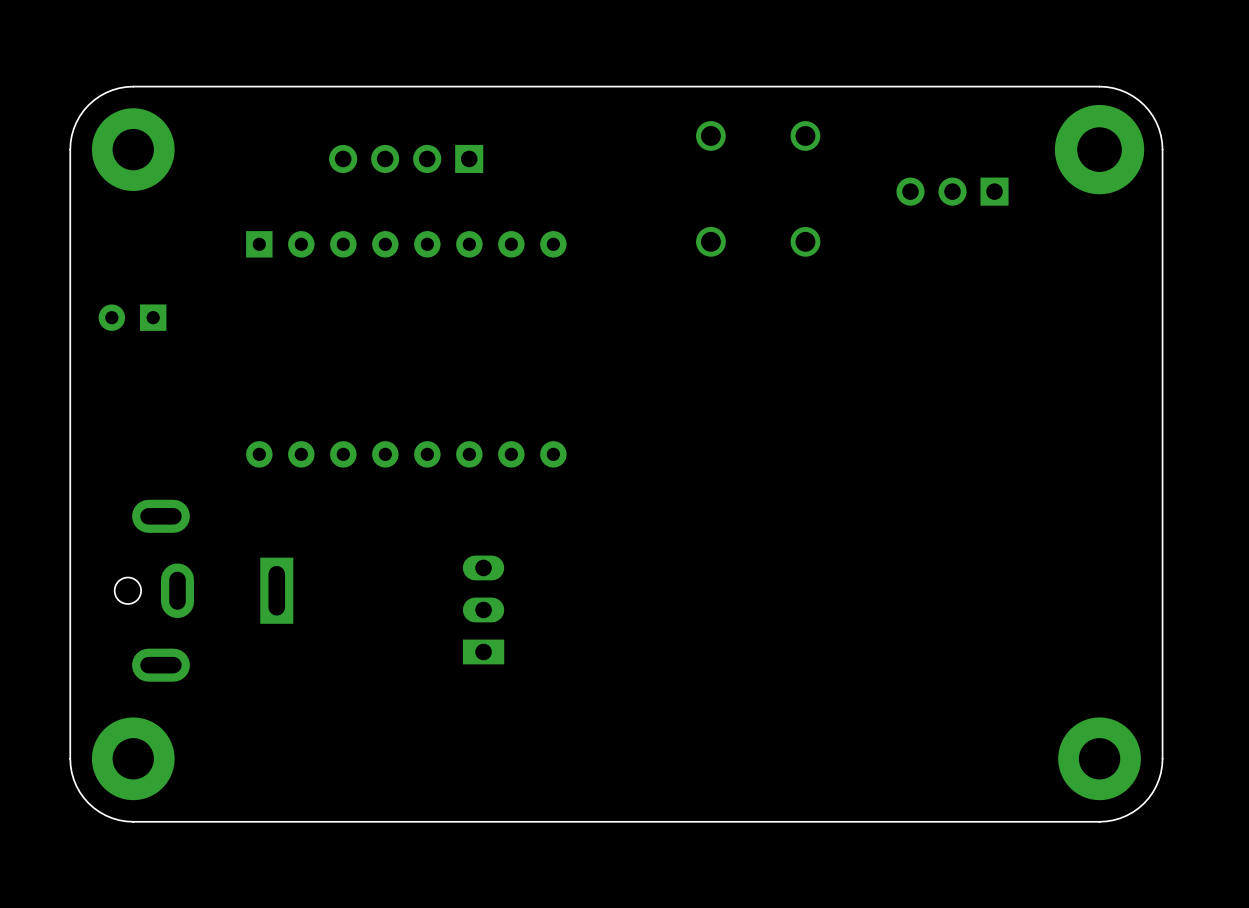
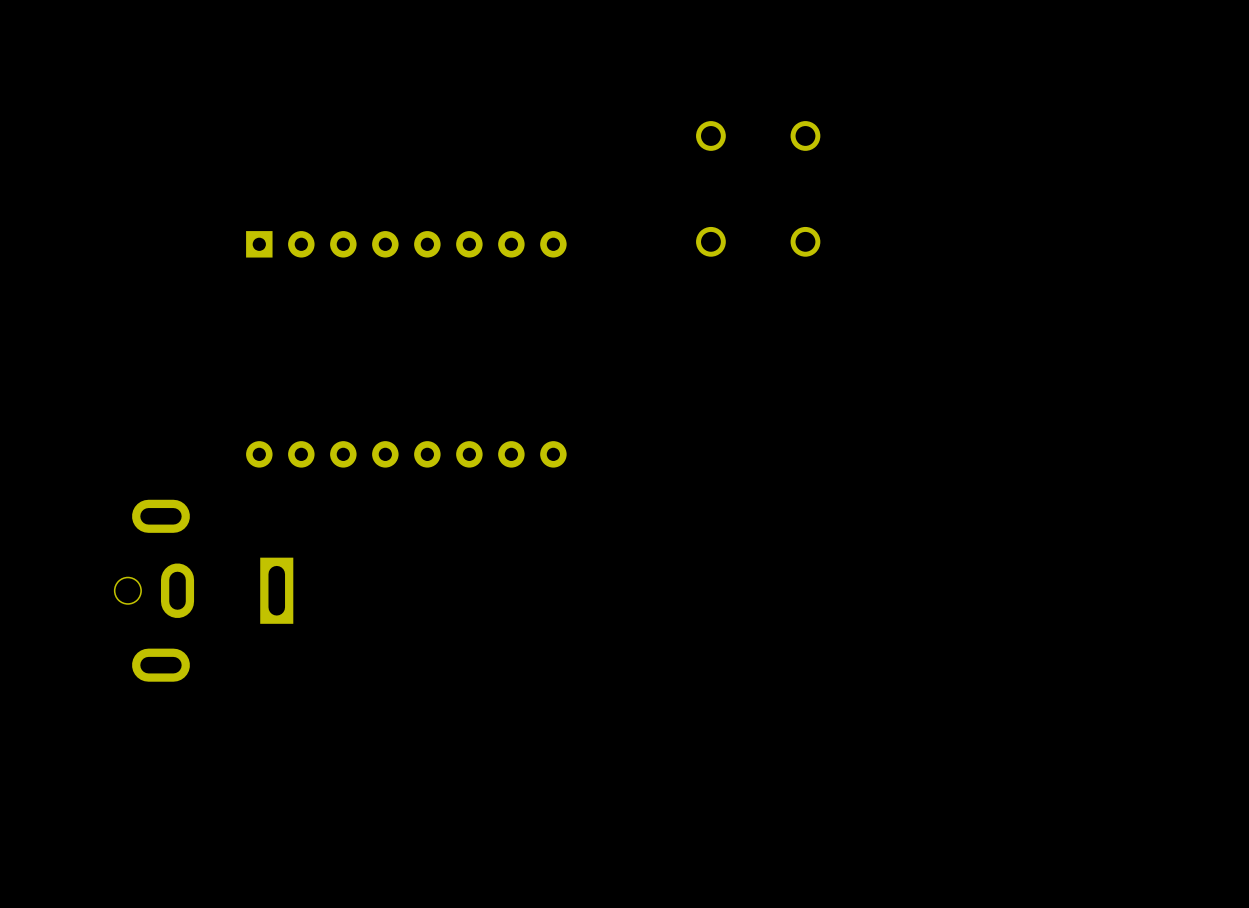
board edge: (1099, 86) (133, 86) (119, 88) (99, 96) (88, 105) (76, 122) (71, 135) (70, 149) (70, 758) (71, 772) (79, 792) (88, 803) (99, 812) (112, 818) (133, 821) (1099, 821) (1113, 820) (1133, 812) (1148, 798) (1156, 786) (1160, 772) (1162, 758) (1162, 149) (1159, 128) (1152, 116) (1144, 105) (1126, 92) (1113, 88) (1099, 86) -> none
part: (133, 149) -> none
part: (1099, 149) -> none
part: (406, 158) -> none
part: (952, 191) -> none
part: (132, 317) -> none
part: (483, 609) -> none
part: (133, 758) -> none
part: (1099, 758) -> none

